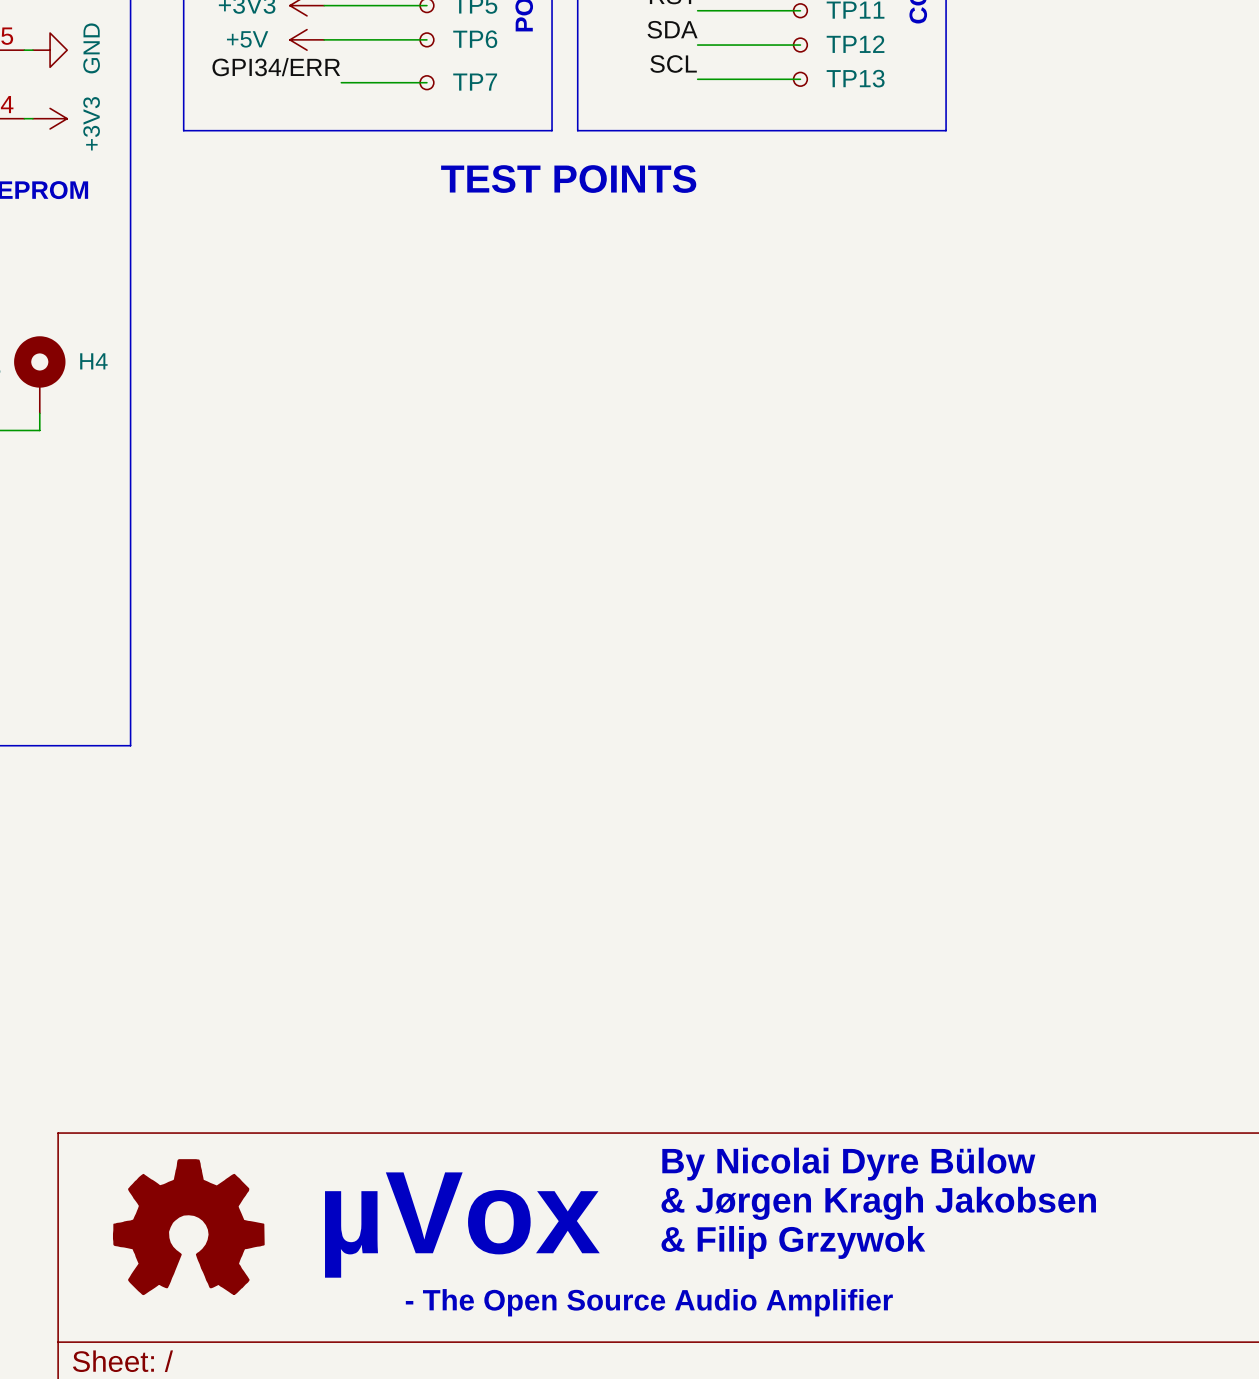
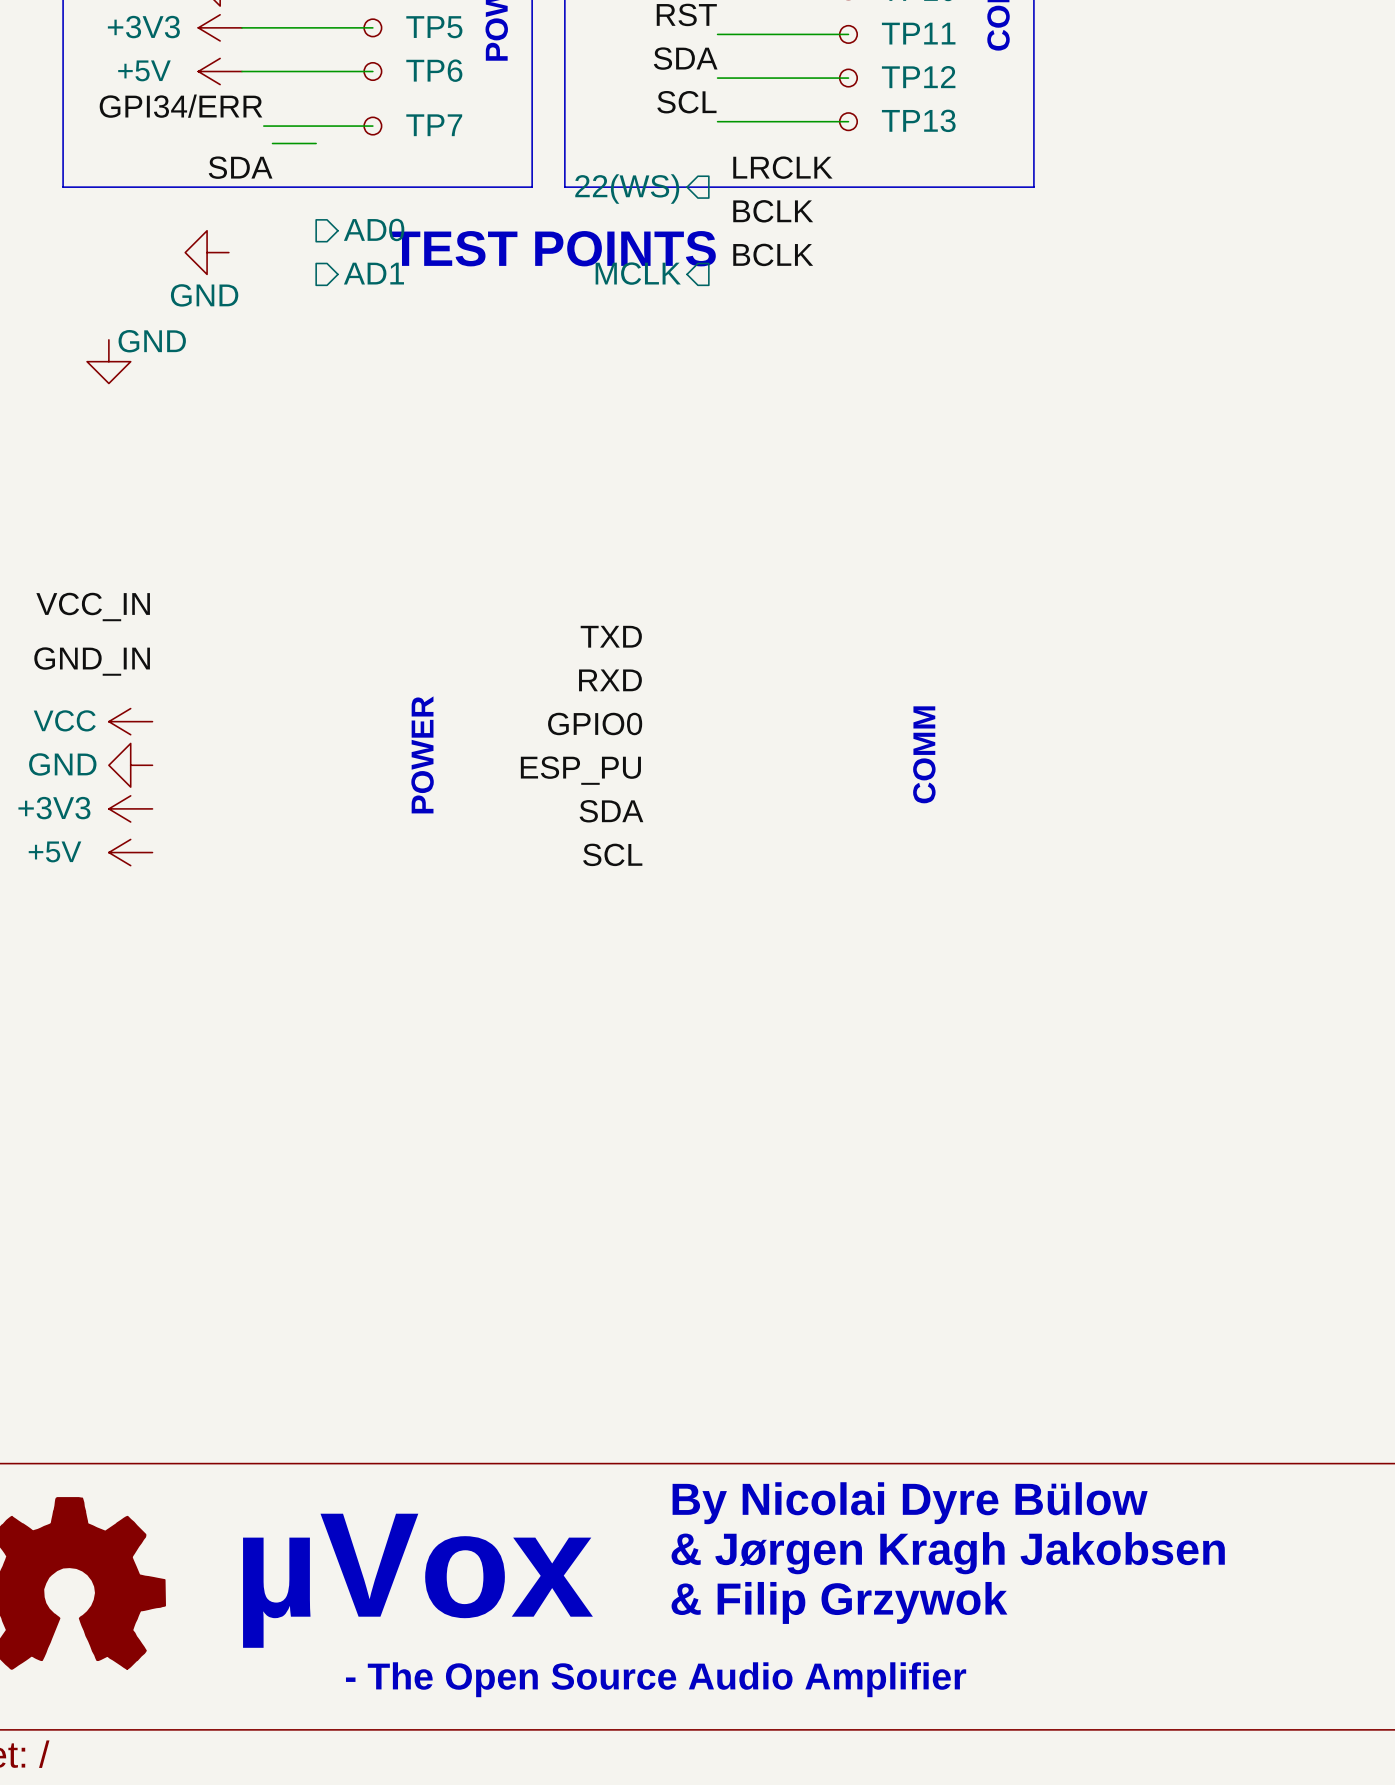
wire: none -> (272, 143) (316, 143)
label: none -> SDA (240, 167)
label: none -> LRCLK (782, 167)
sheet pin: none -> 22(WS) (627, 189)
label: none -> BCLK (773, 211)
sheet pin: none -> AD0 (374, 229)
power symbol: none -> GND (207, 252)
label: none -> BCLK (773, 254)
sheet pin: none -> AD1 (373, 273)
sheet pin: none -> MCLK (638, 273)
power symbol: none -> GND (108, 361)
label: none -> VCC_IN (93, 606)
label: none -> TXD (611, 636)
label: none -> GND_IN (92, 661)
label: none -> RXD (610, 680)
power symbol: none -> VCC (130, 721)
label: none -> GPIO0 (595, 723)
text: none -> POWER (422, 754)
text: none -> COMM (924, 754)
power symbol: none -> GND (130, 765)
label: none -> ESP_PU (580, 770)
power symbol: none -> +3V3 (130, 808)
label: none -> SDA (611, 811)
power symbol: none -> +5V (130, 852)
label: none -> SCL (612, 854)

